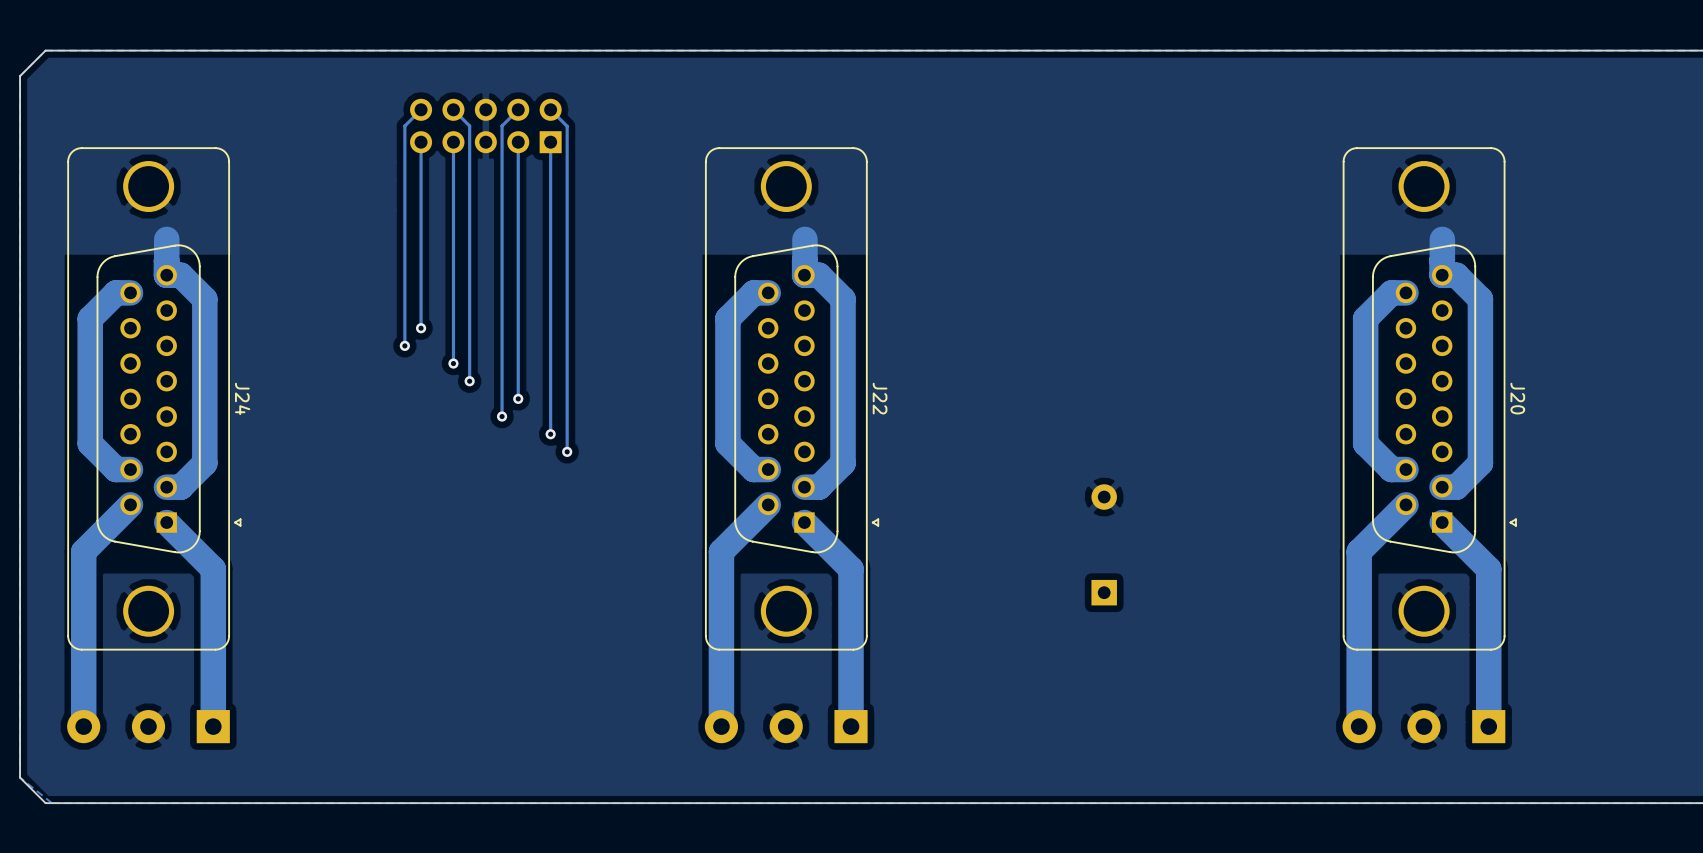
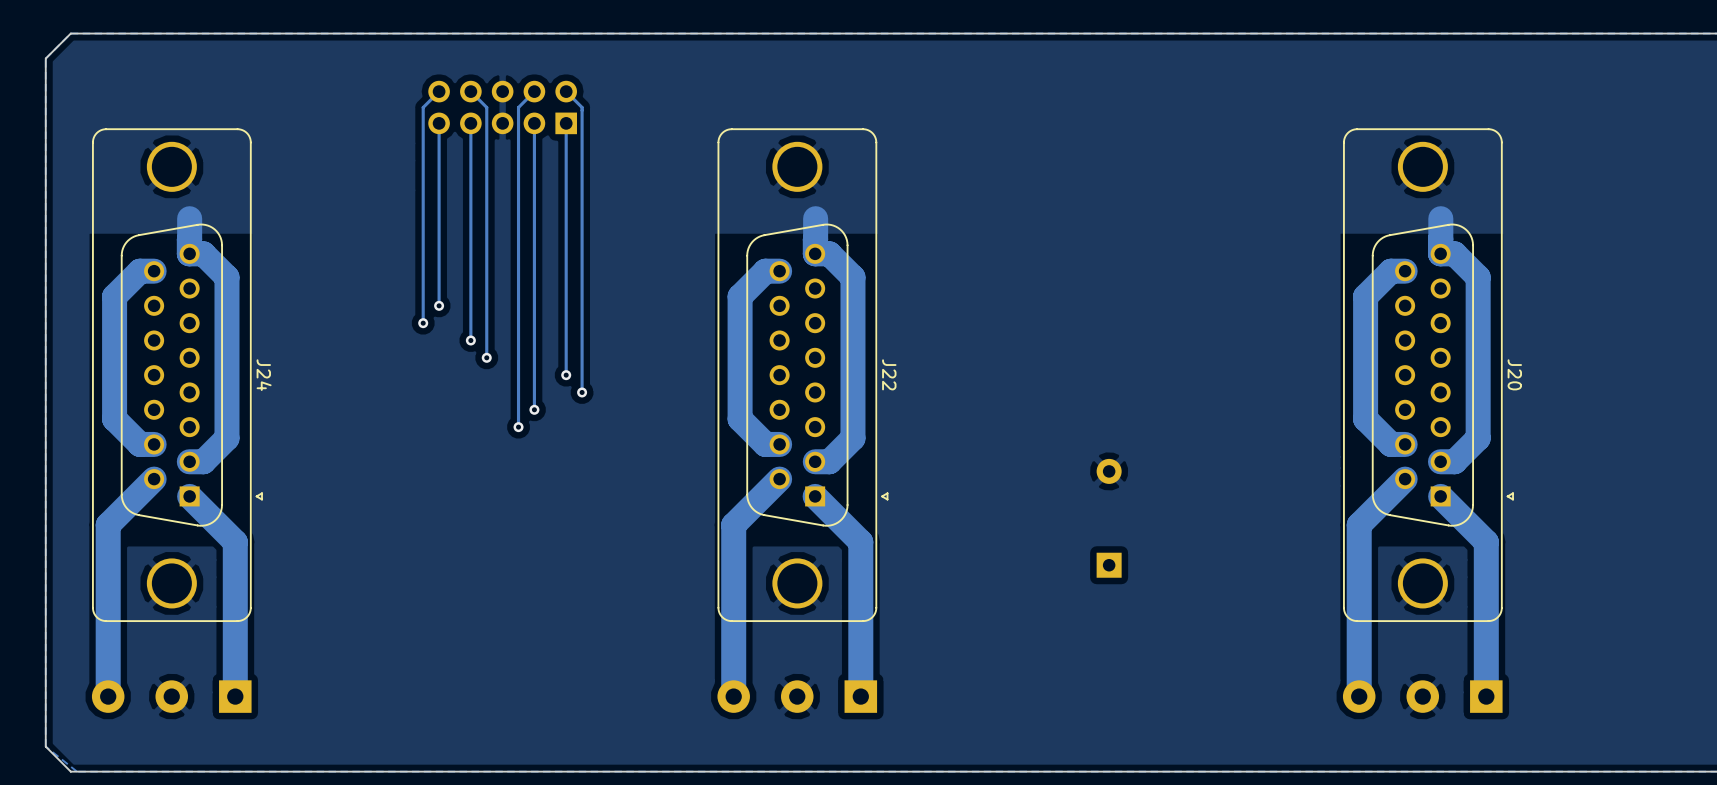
track: (566, 126) (567, 451) -> (582, 107) (582, 392)
via: (518, 398) -> none
track: (550, 398) (550, 434) -> (534, 375) (534, 409)
via: none -> (566, 375)
track: none -> (518, 392) (518, 427)
via: (502, 416) -> none
via: none -> (582, 392)
via: none -> (534, 409)
via: (550, 434) -> none
via: none -> (518, 427)
via: (567, 451) -> none

